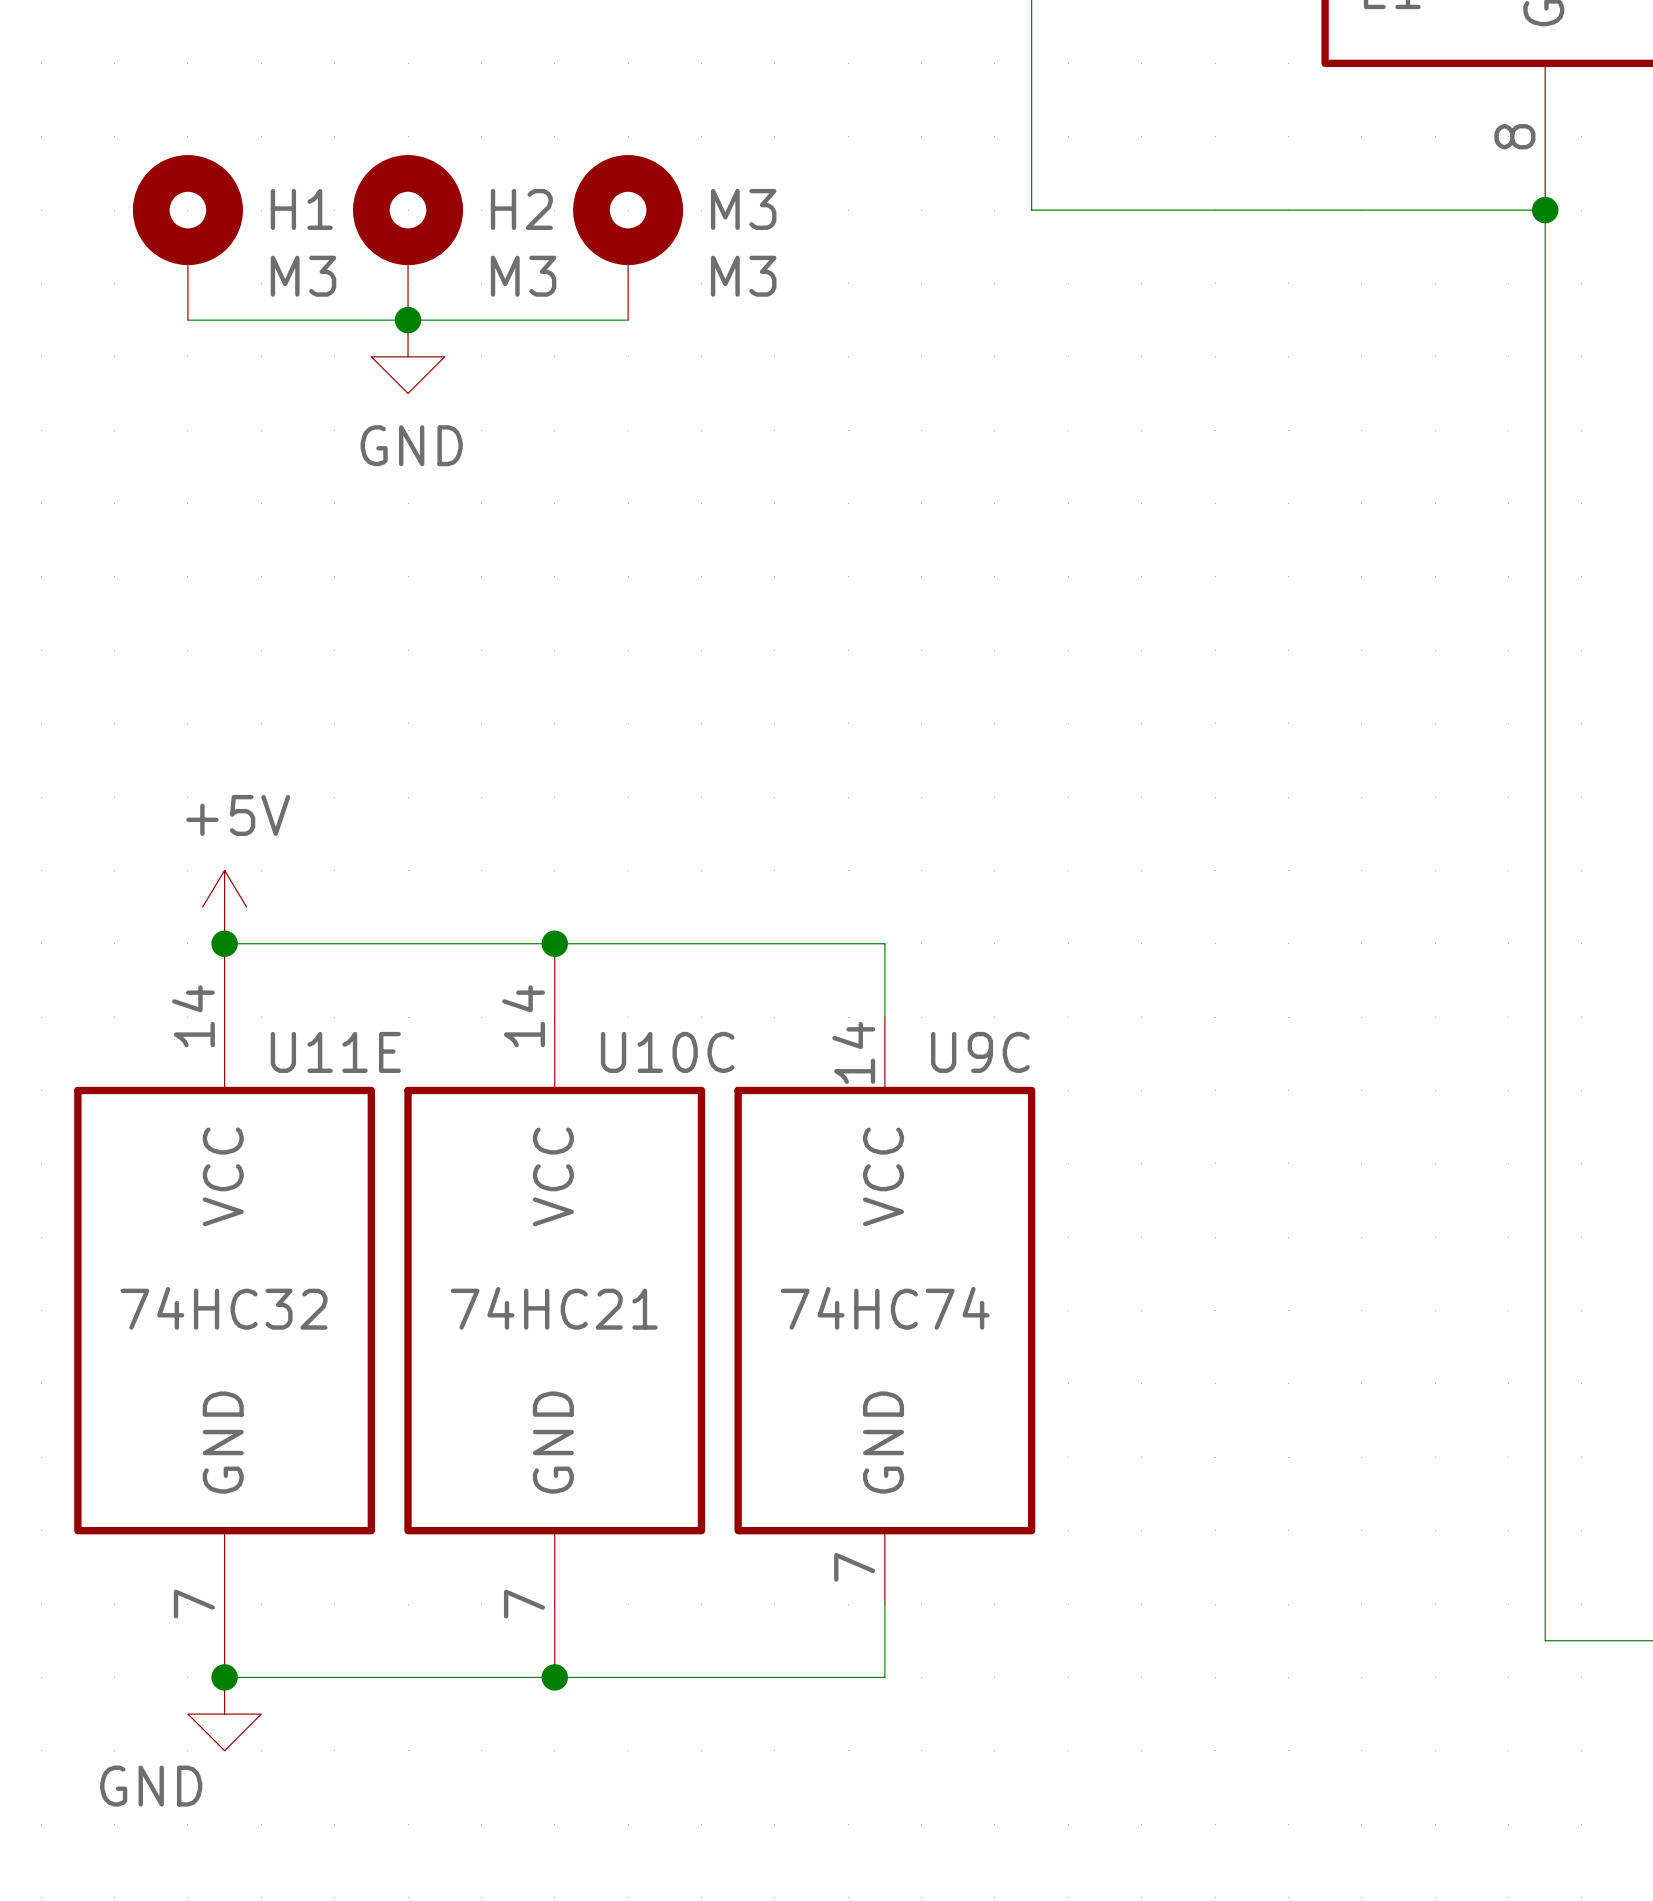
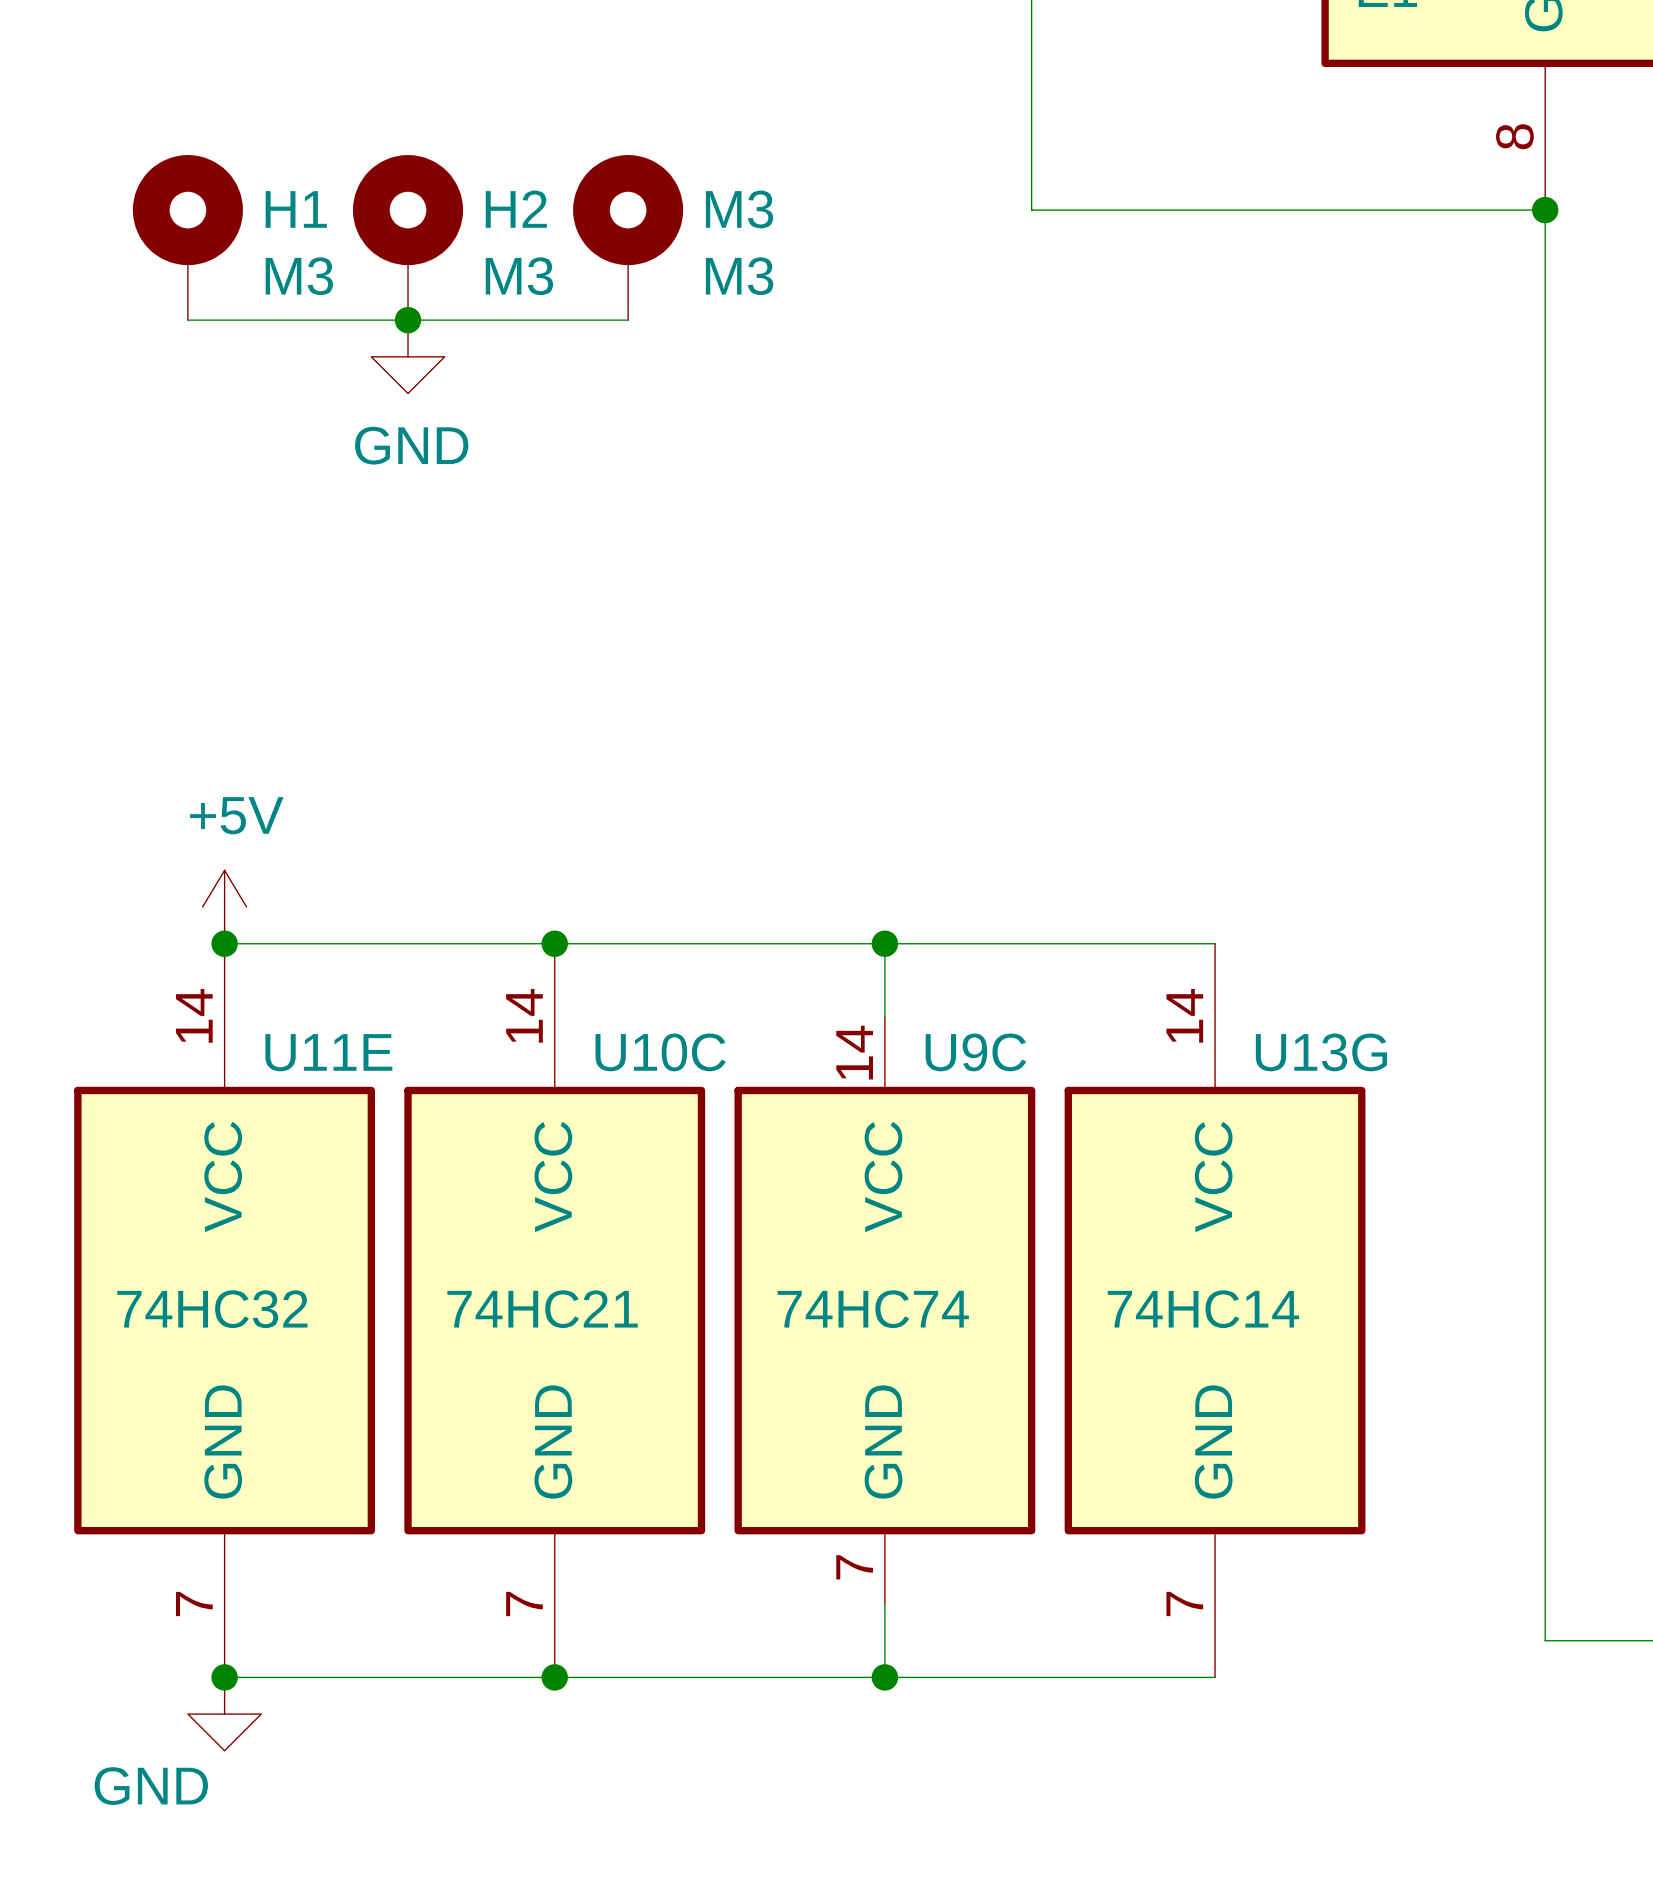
wire: none -> (884, 943) (1215, 943)
junction: none -> (884, 943)
U13G: none -> 74HC14 (1215, 1310)
wire: none -> (884, 1677) (1215, 1677)
junction: none -> (884, 1677)

